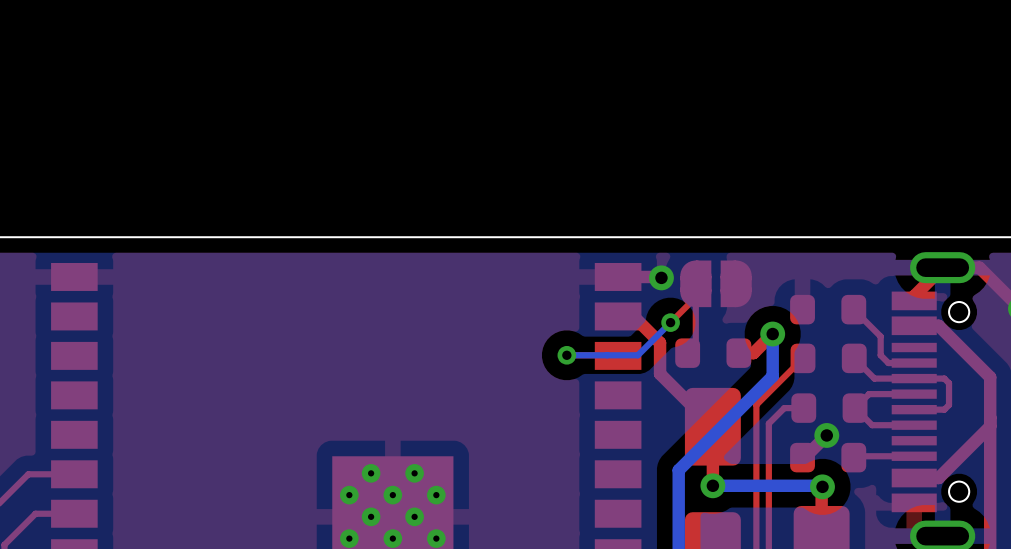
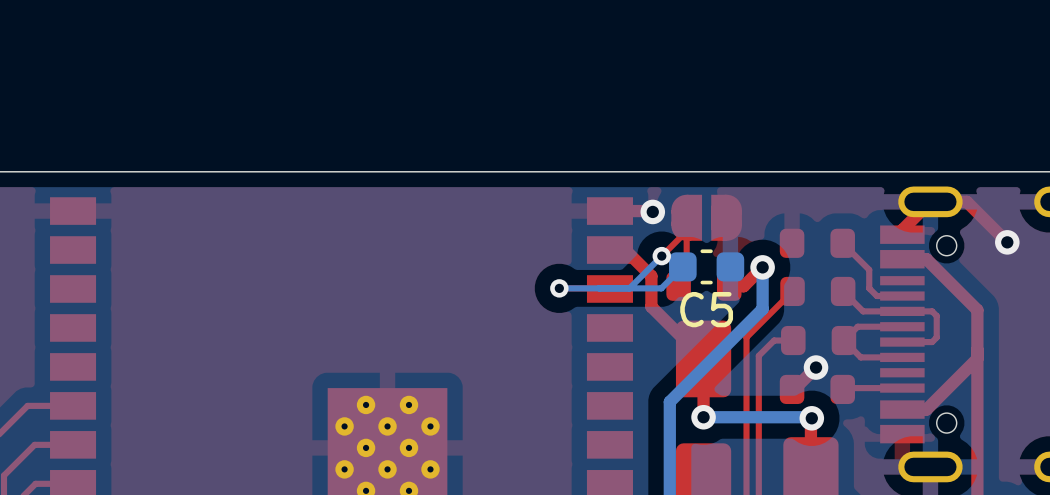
bottom track: none -> (682, 266) (661, 288) (629, 288)
C5: none -> (706, 266)

